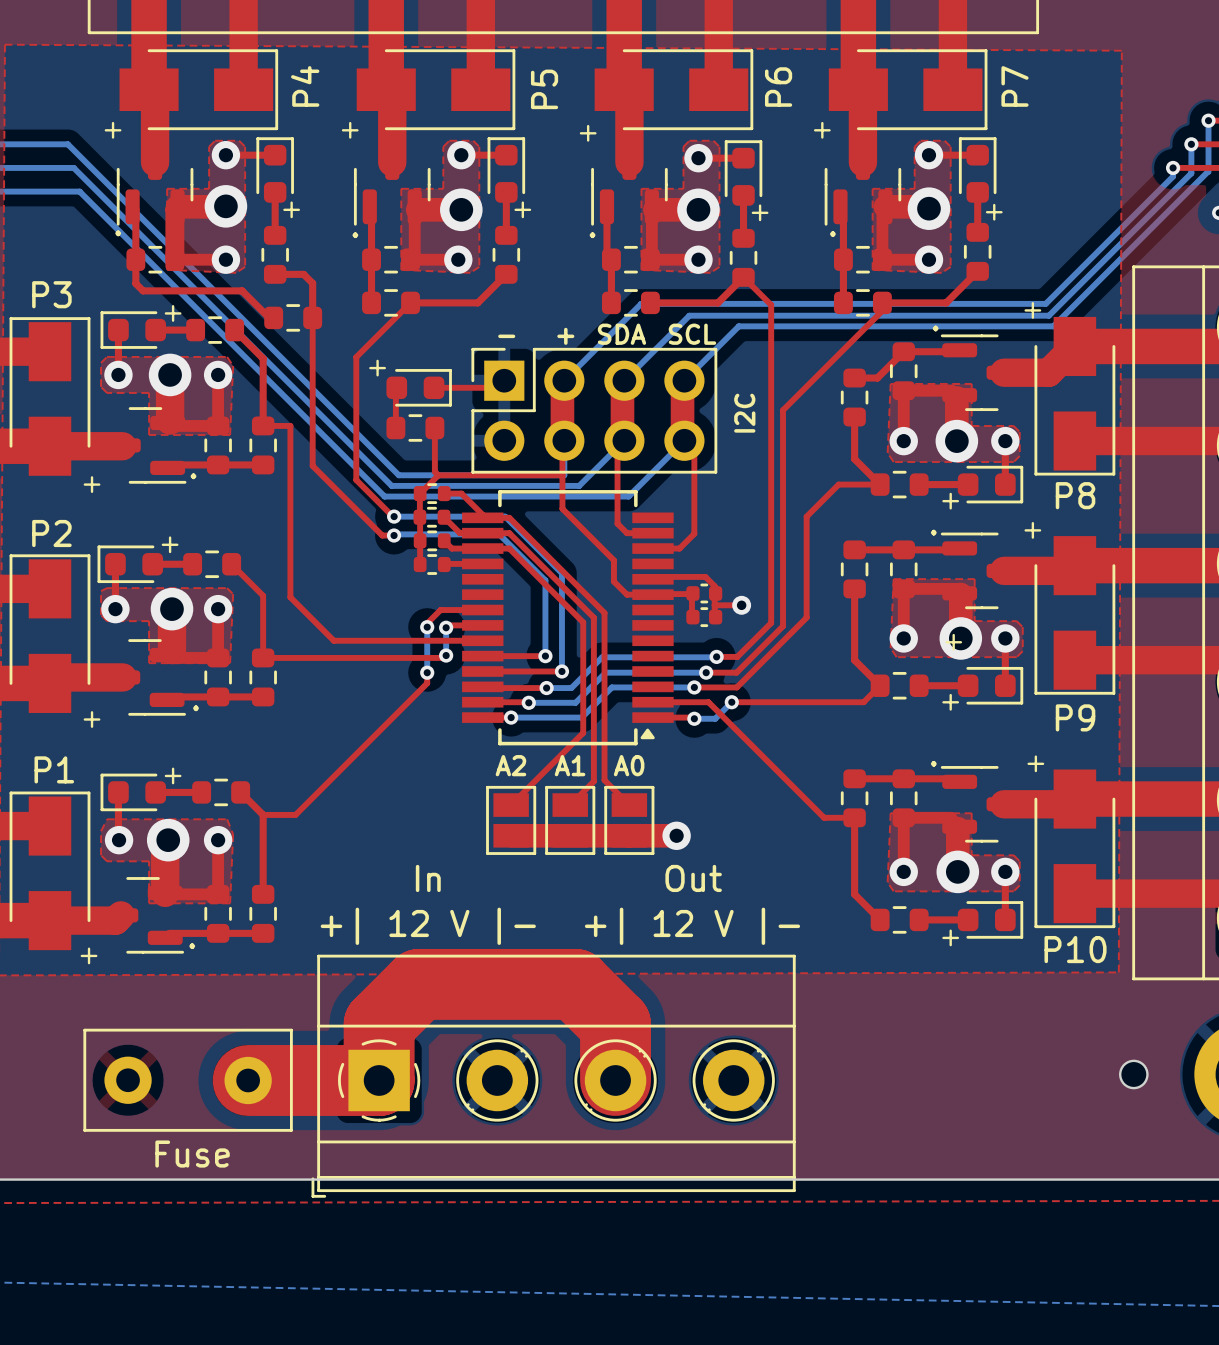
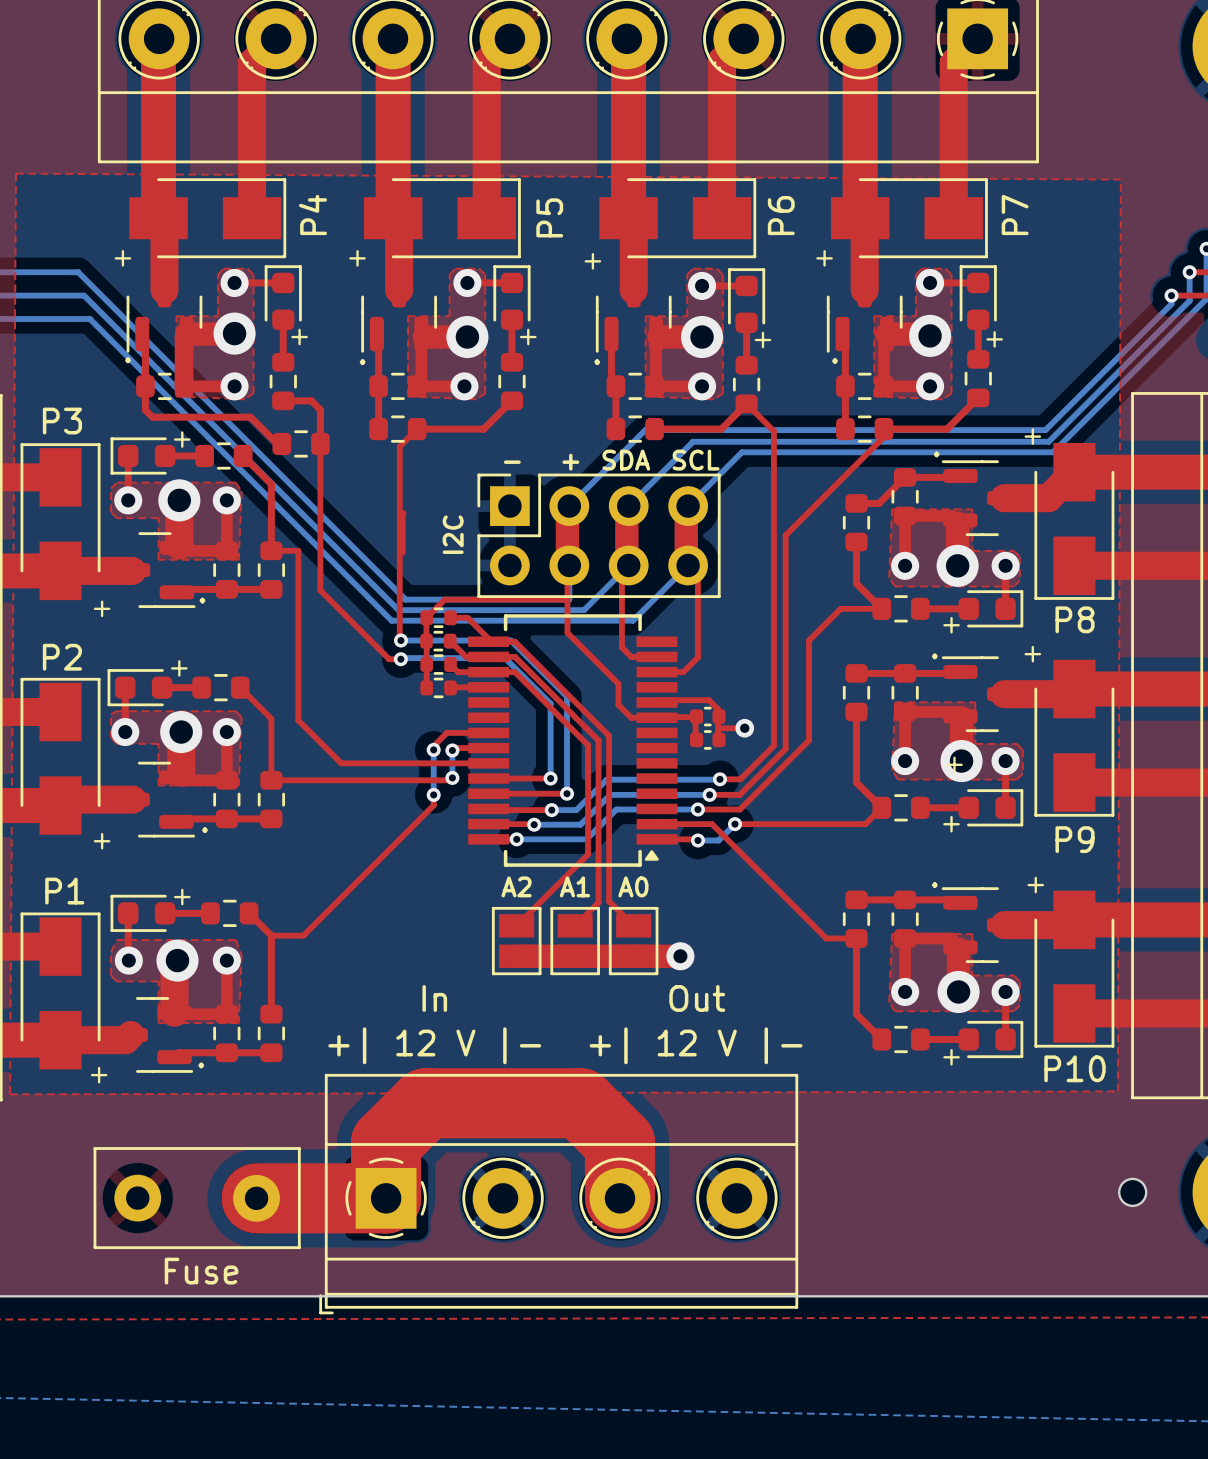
top track: (392, 320) (356, 357) (356, 480) (392, 516) -> (399, 446) (399, 640)
text: + (377, 368) -> none
top track: (504, 380) (497, 387) (434, 387) -> none
part: (419, 387) -> none
text position: I2C (744, 413) -> I2C (453, 534)
part: (415, 428) -> none
top track: (434, 428) (434, 471) (438, 475) -> none

